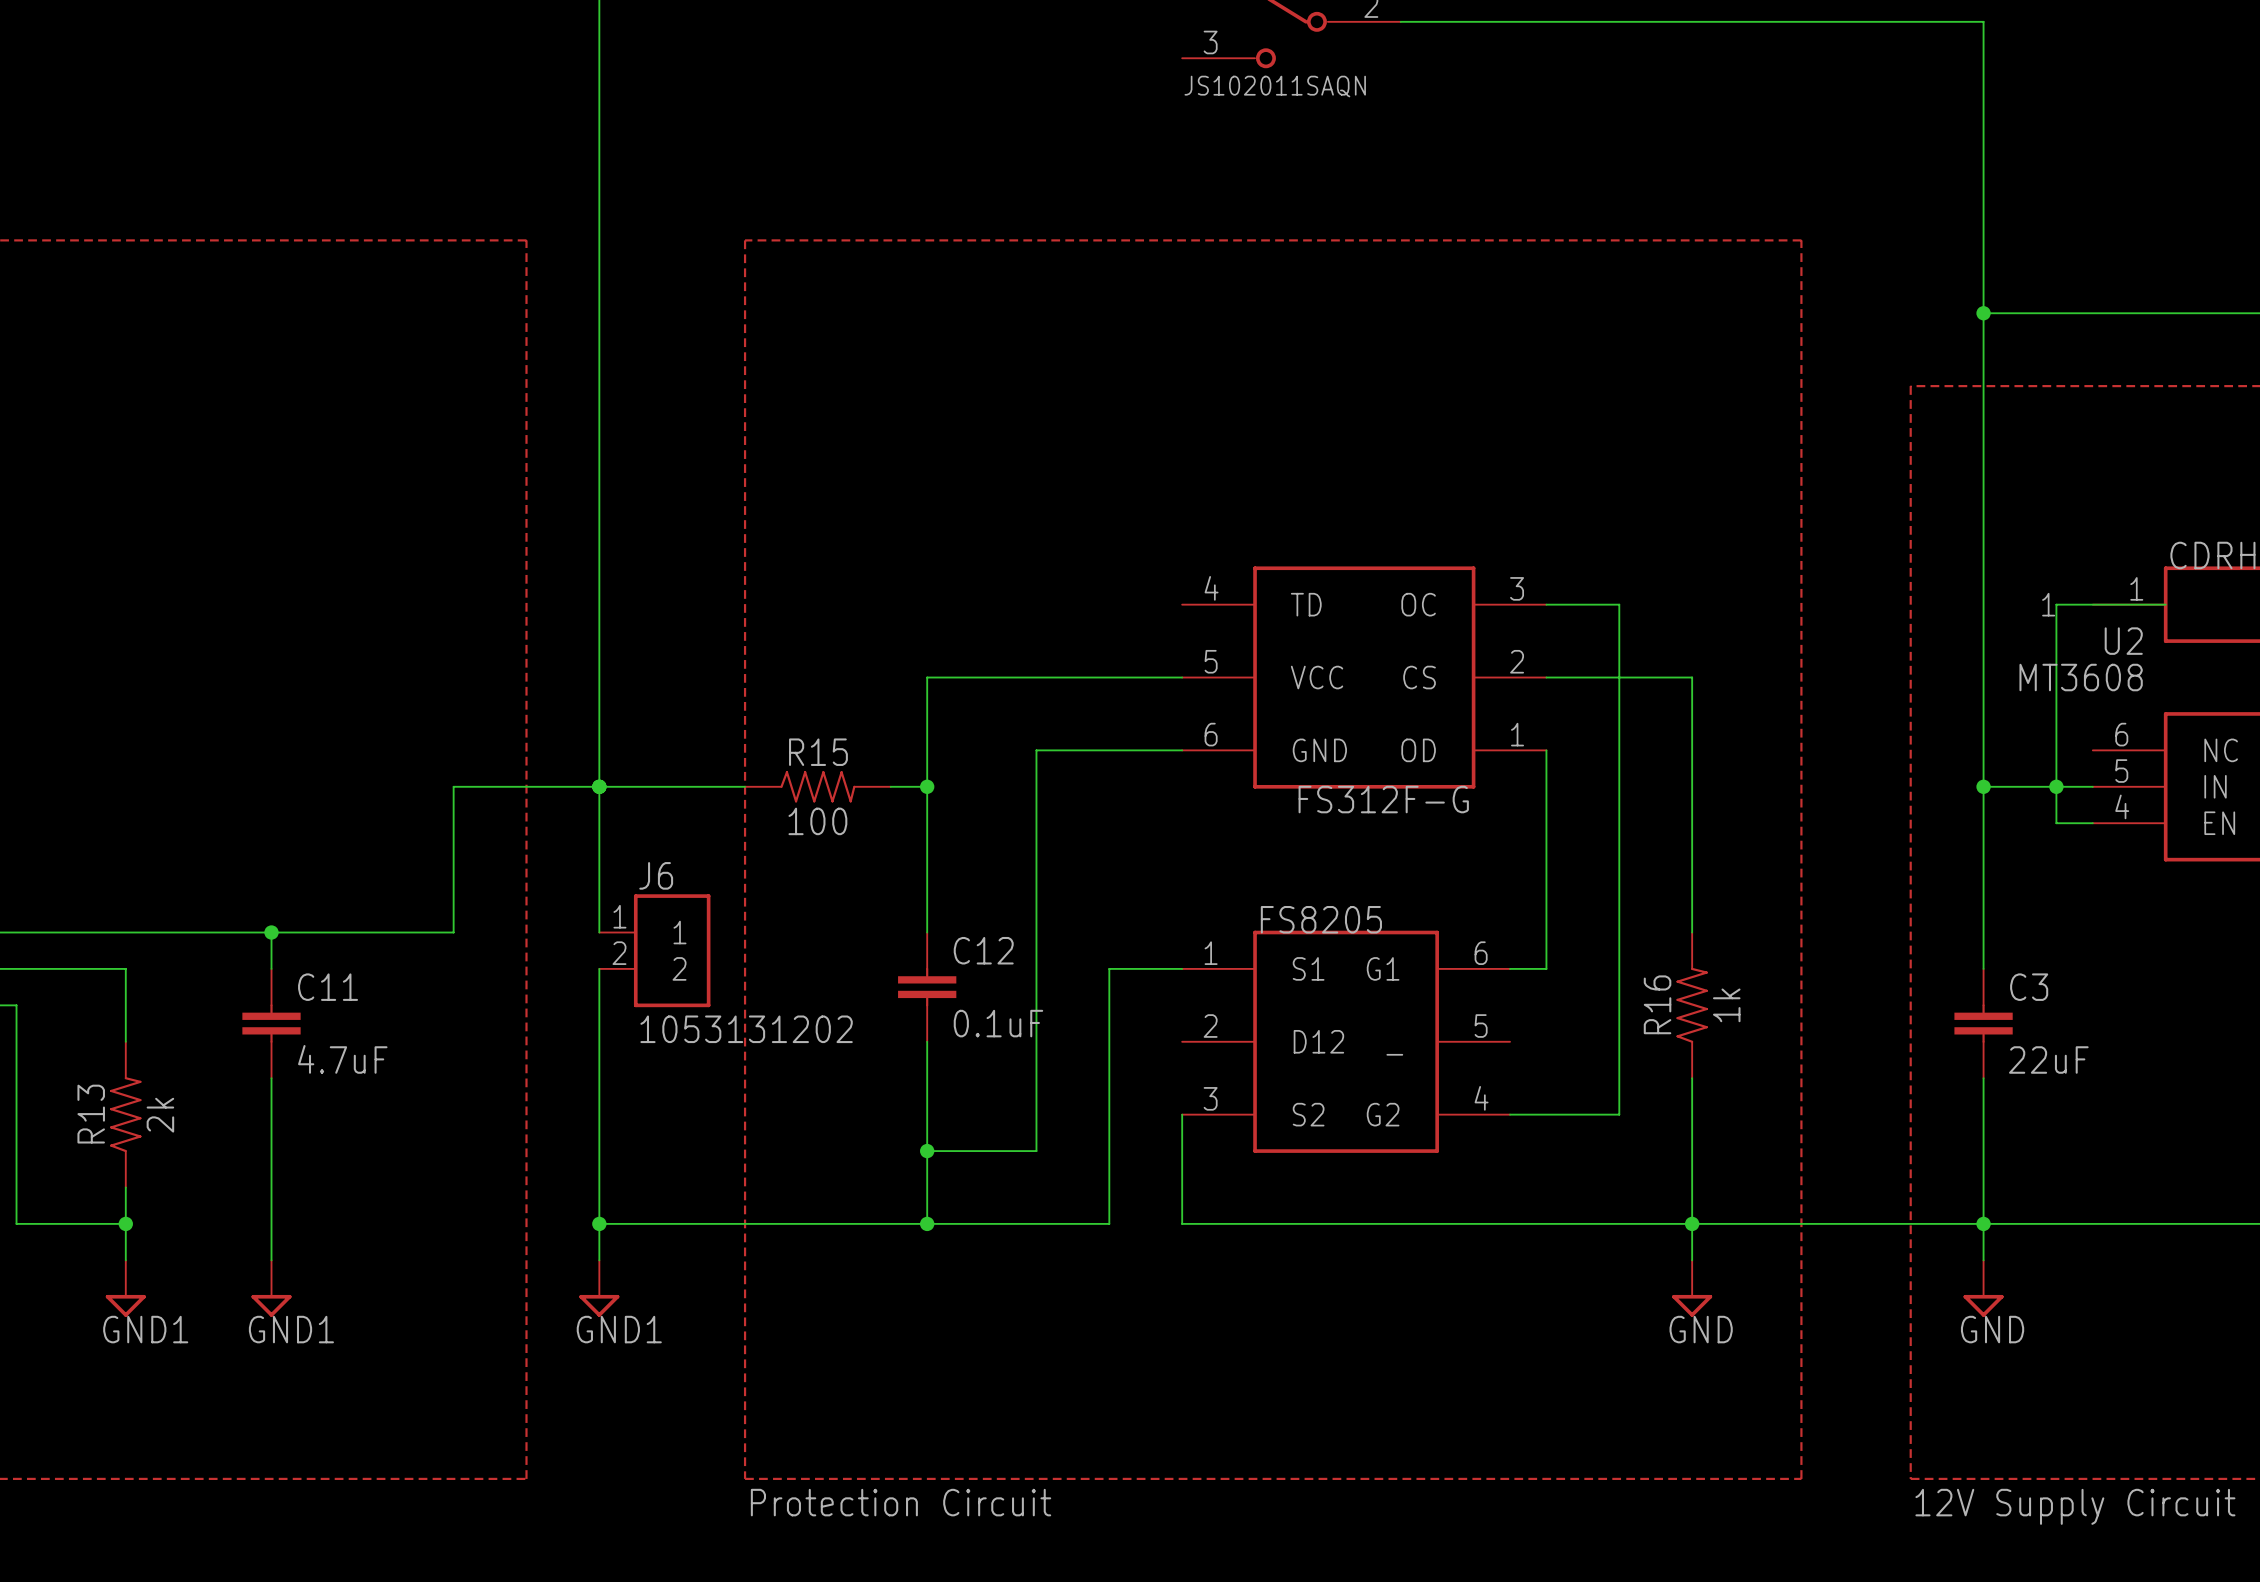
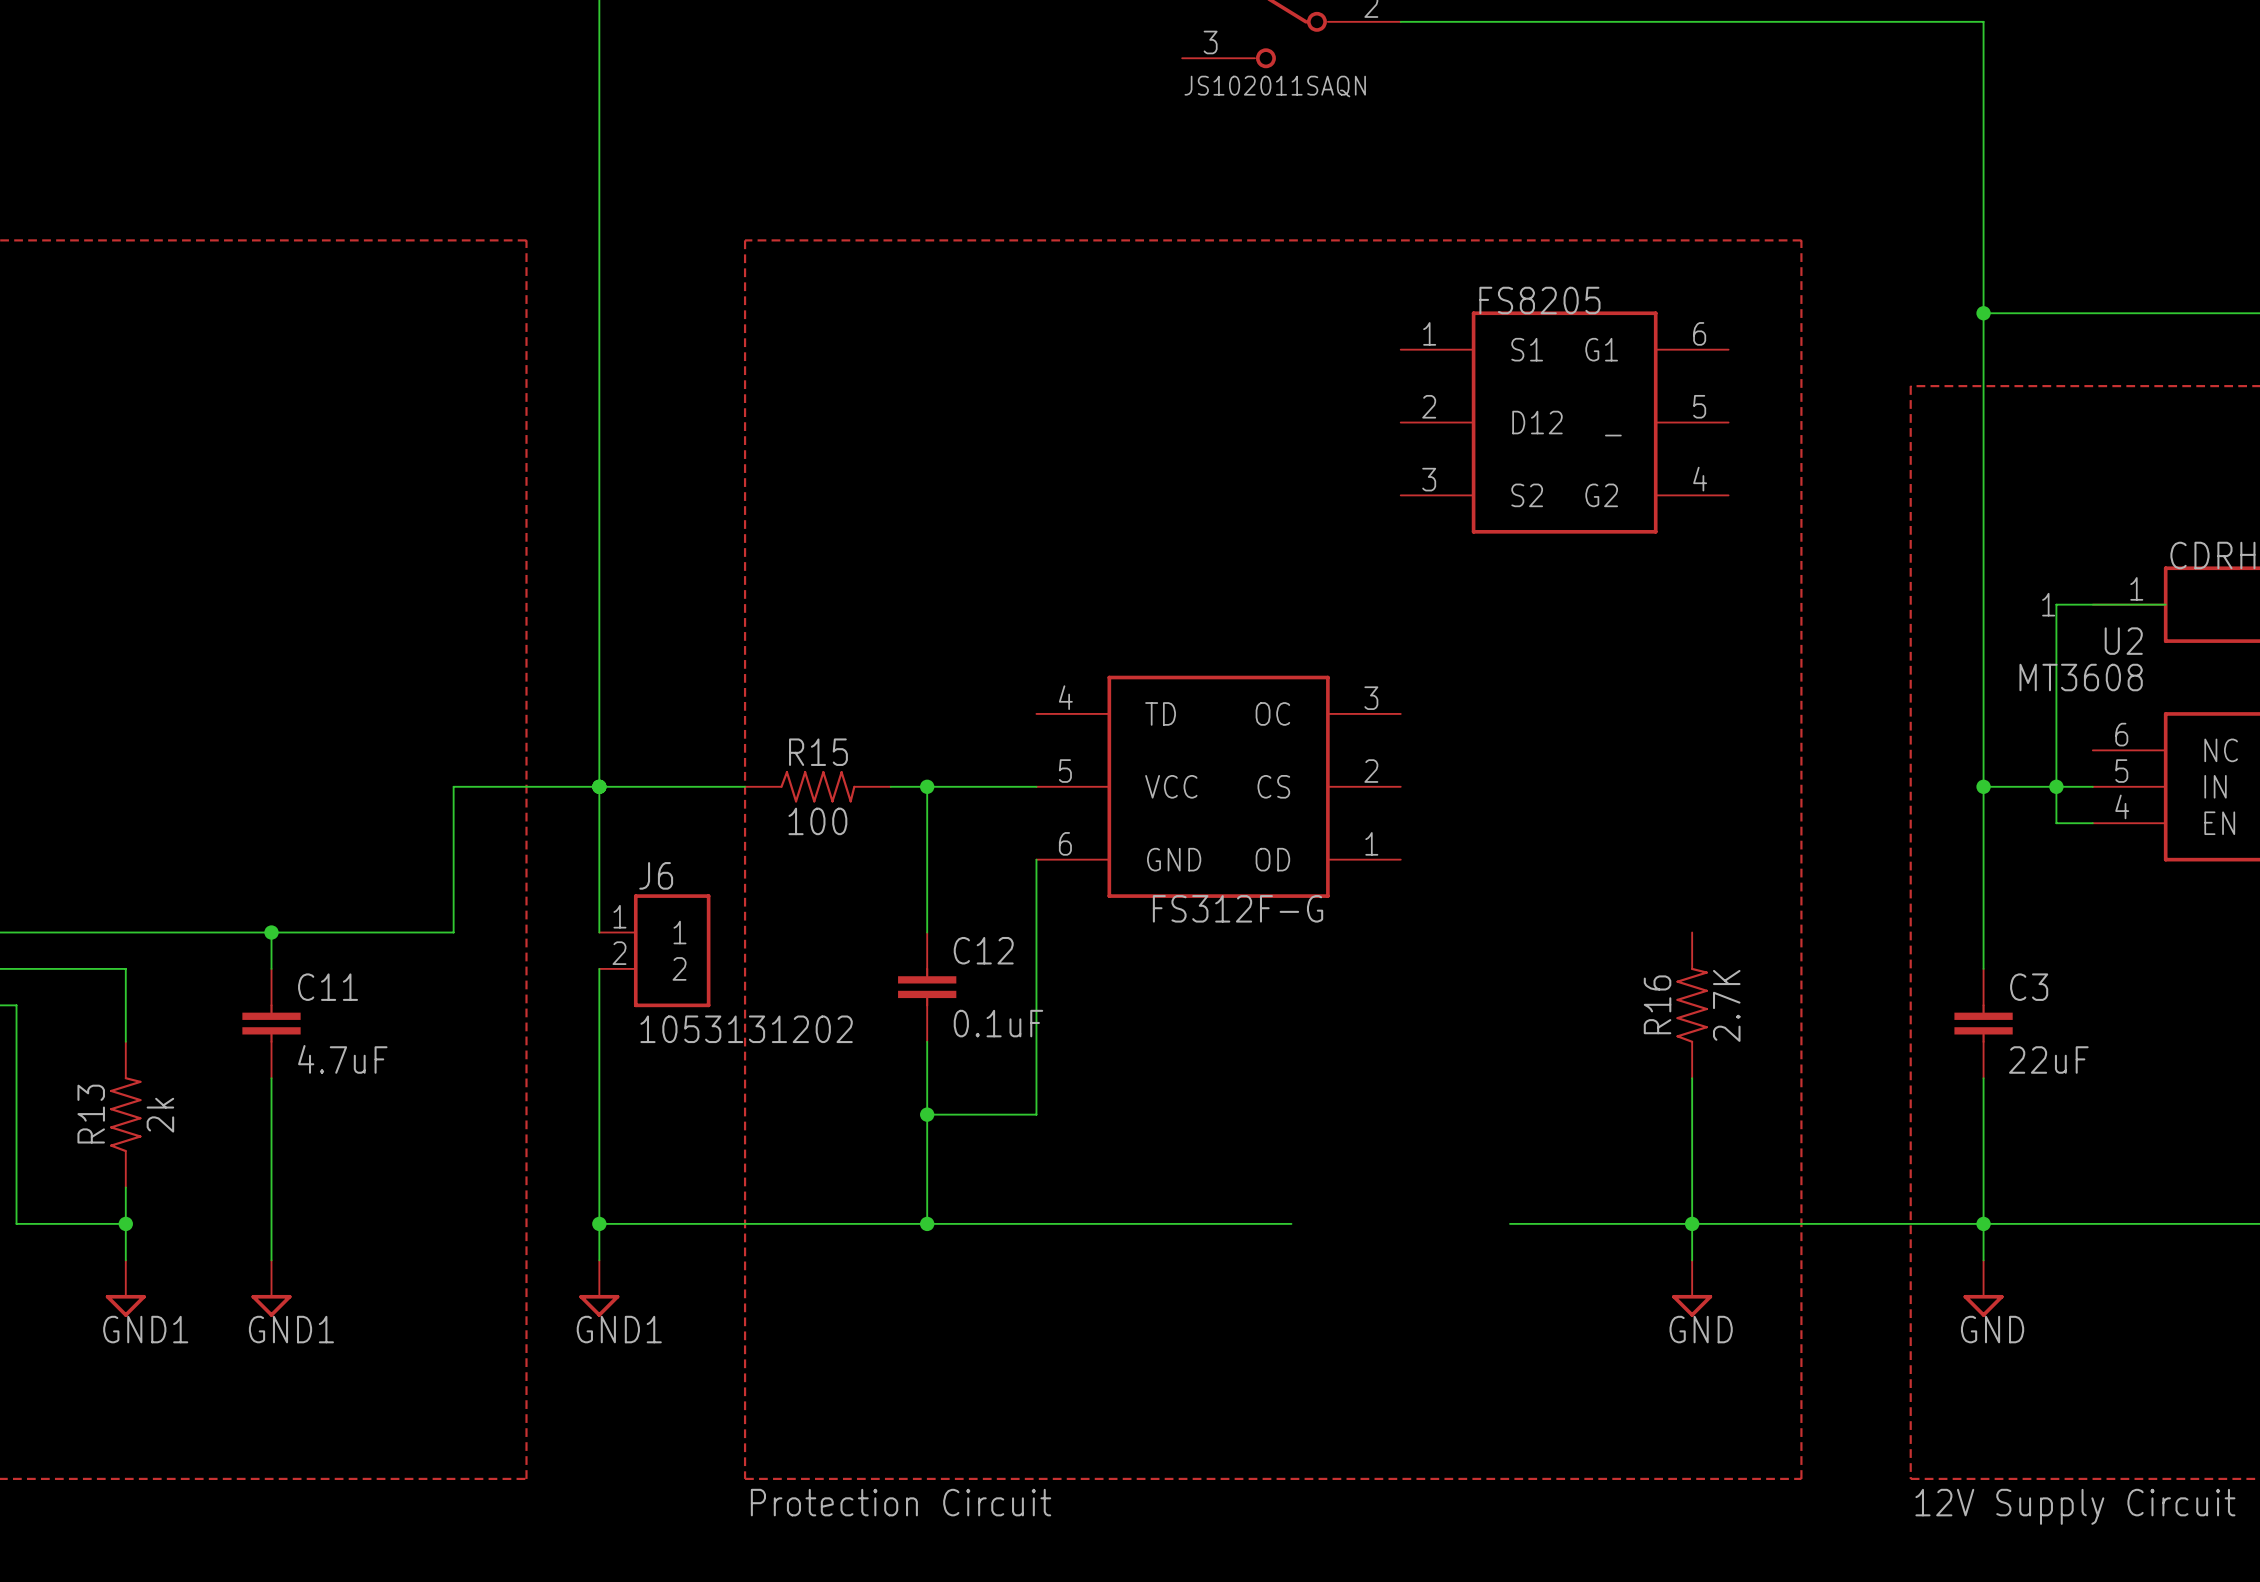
part: none -> (1564, 422)
wire: (1546, 604) (1619, 604) (1619, 1114) (1510, 1114) -> none
wire: (1182, 677) (927, 677) (927, 786) -> (1036, 786) (927, 786)
part position: (1364, 677) -> (1218, 786)
wire: (1546, 677) (1692, 677) (1692, 932) -> none
wire: (1182, 750) (1036, 750) (1036, 859) -> none
wire: (1546, 750) (1546, 968) (1510, 968) -> none
wire: (1182, 968) (1109, 968) (1109, 1223) -> none
R16 value: 1k (1726, 1005) -> 2.7K (1726, 1005)
part: (1346, 1041) -> none
wire: (1036, 1114) (1036, 1151) (927, 1151) -> (1036, 1114) (927, 1114)
wire: (1182, 1114) (1182, 1223) -> (1109, 1223) (1182, 1223)
junction position: (927, 1151) -> (927, 1114)
wire: (1291, 1223) (1510, 1223) -> none

